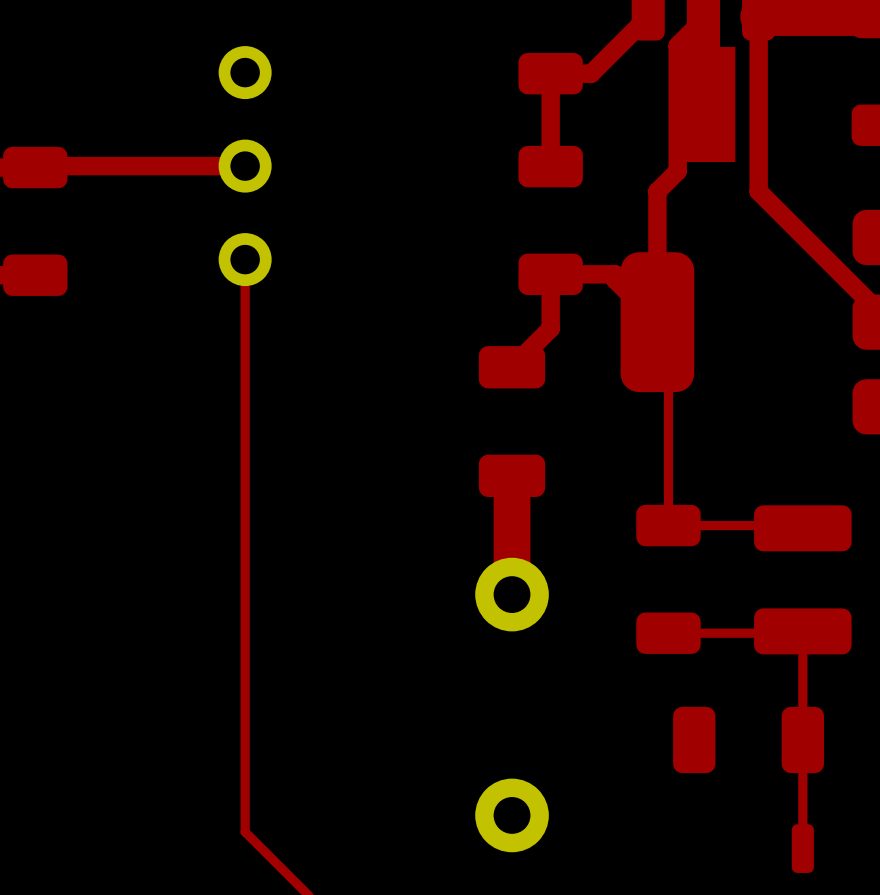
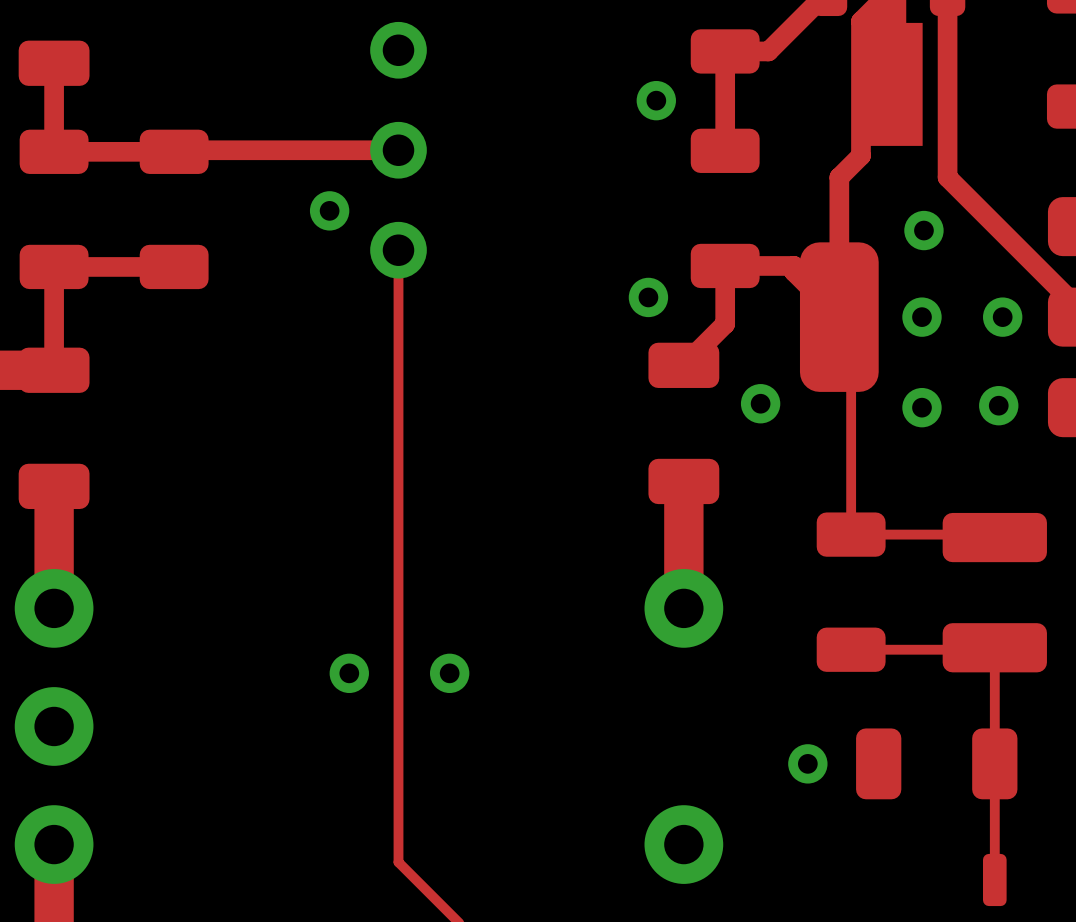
via: none -> (656, 100)
via: none -> (329, 210)
via: none -> (923, 230)
via: none -> (648, 297)
via: none -> (921, 317)
via: none -> (1002, 317)
via: none -> (760, 403)
via: none -> (998, 405)
via: none -> (921, 407)
via: none -> (349, 673)
via: none -> (449, 673)
via: none -> (807, 763)

